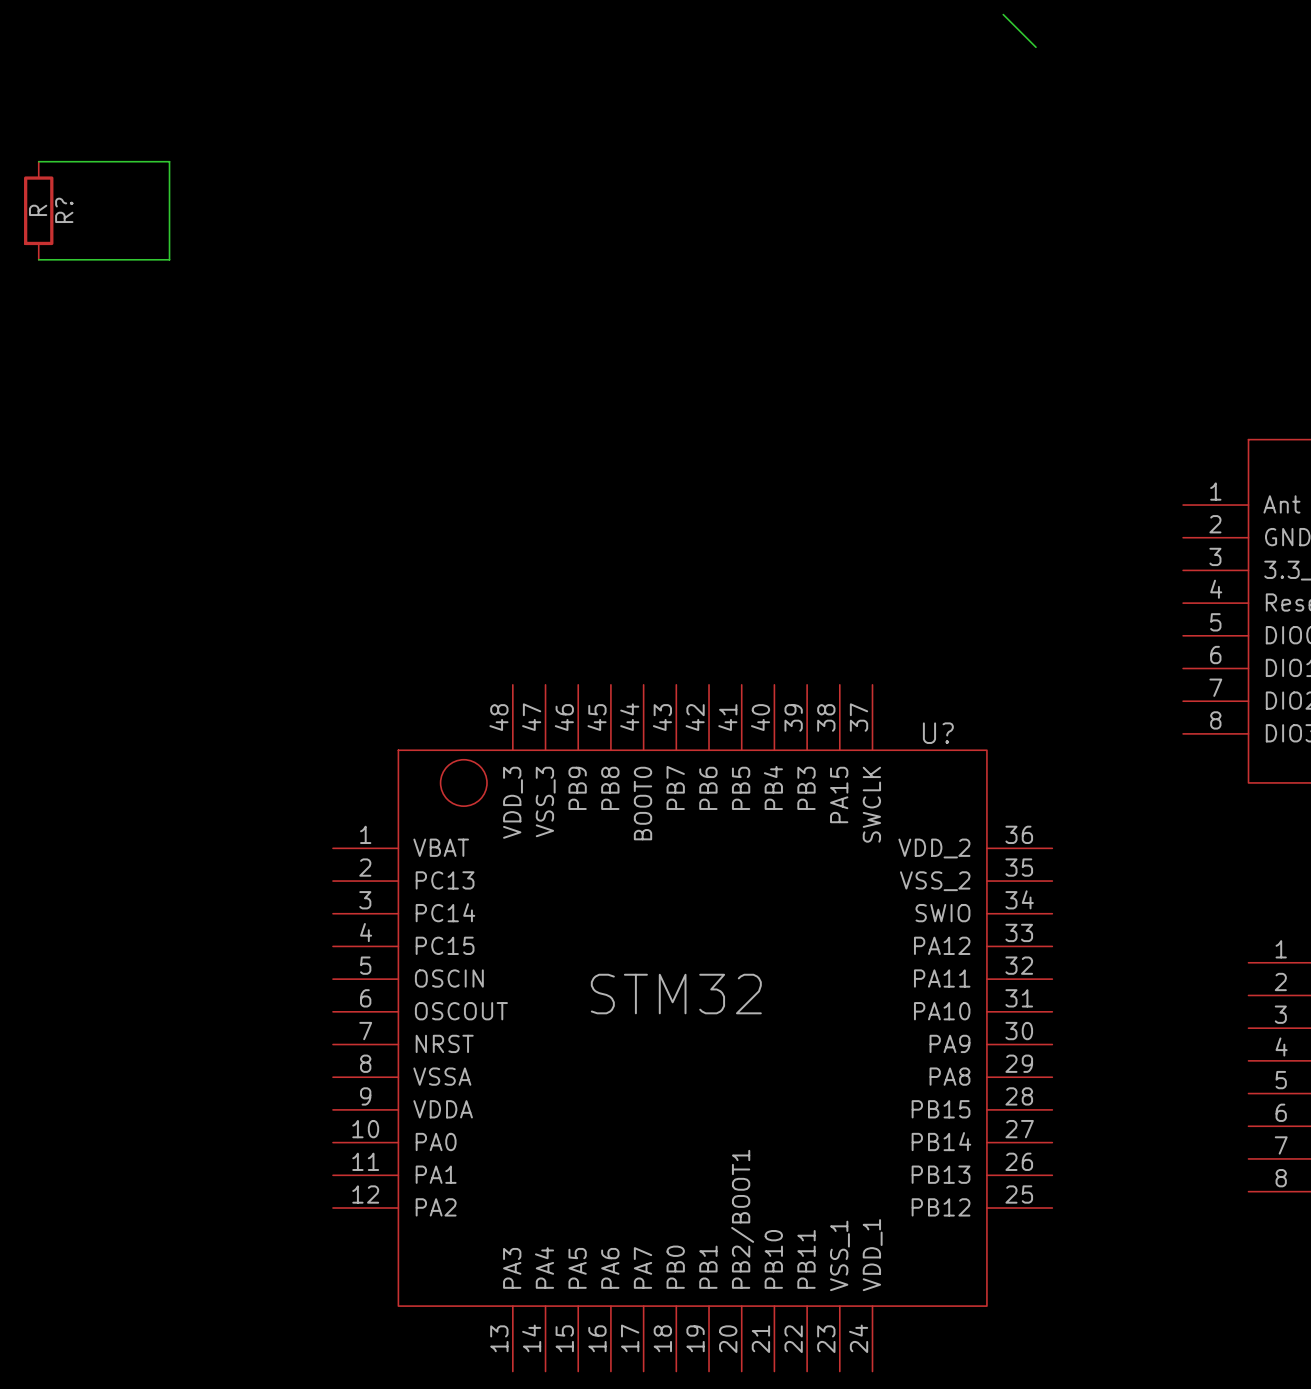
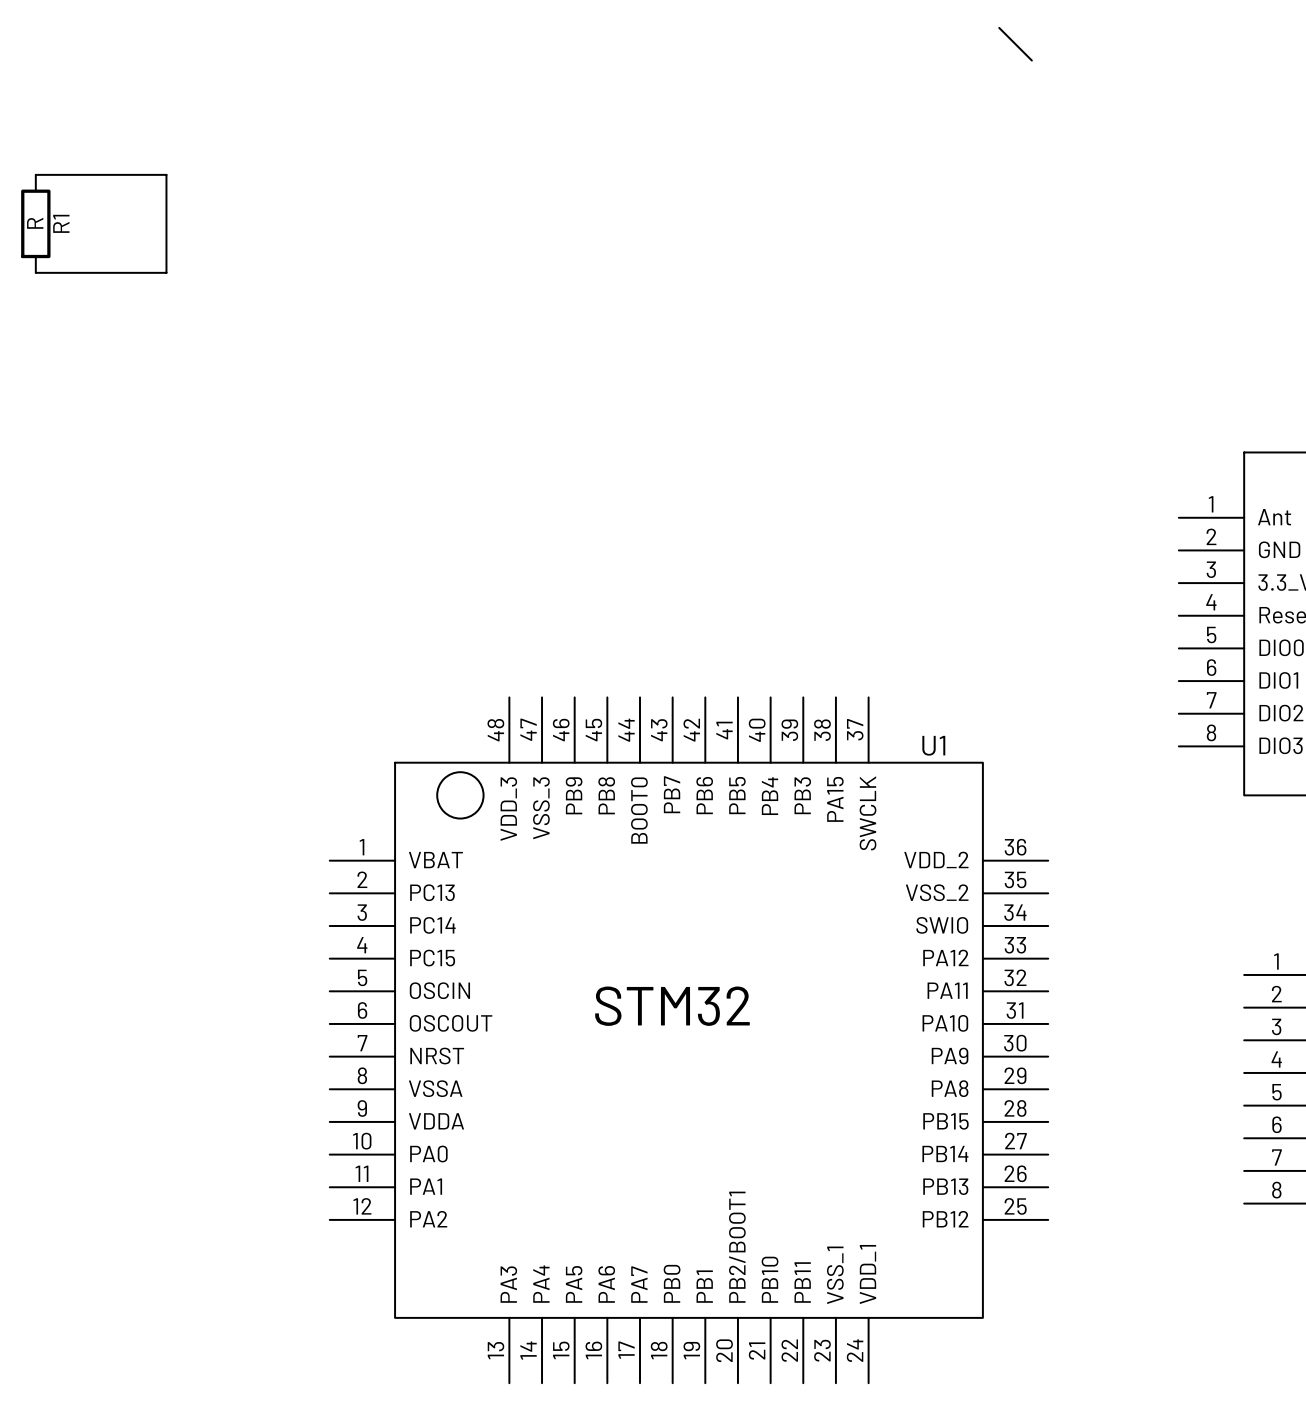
R? name: R? (64, 210) -> R1 (61, 223)
U? name: U? (938, 733) -> U1 (933, 745)

